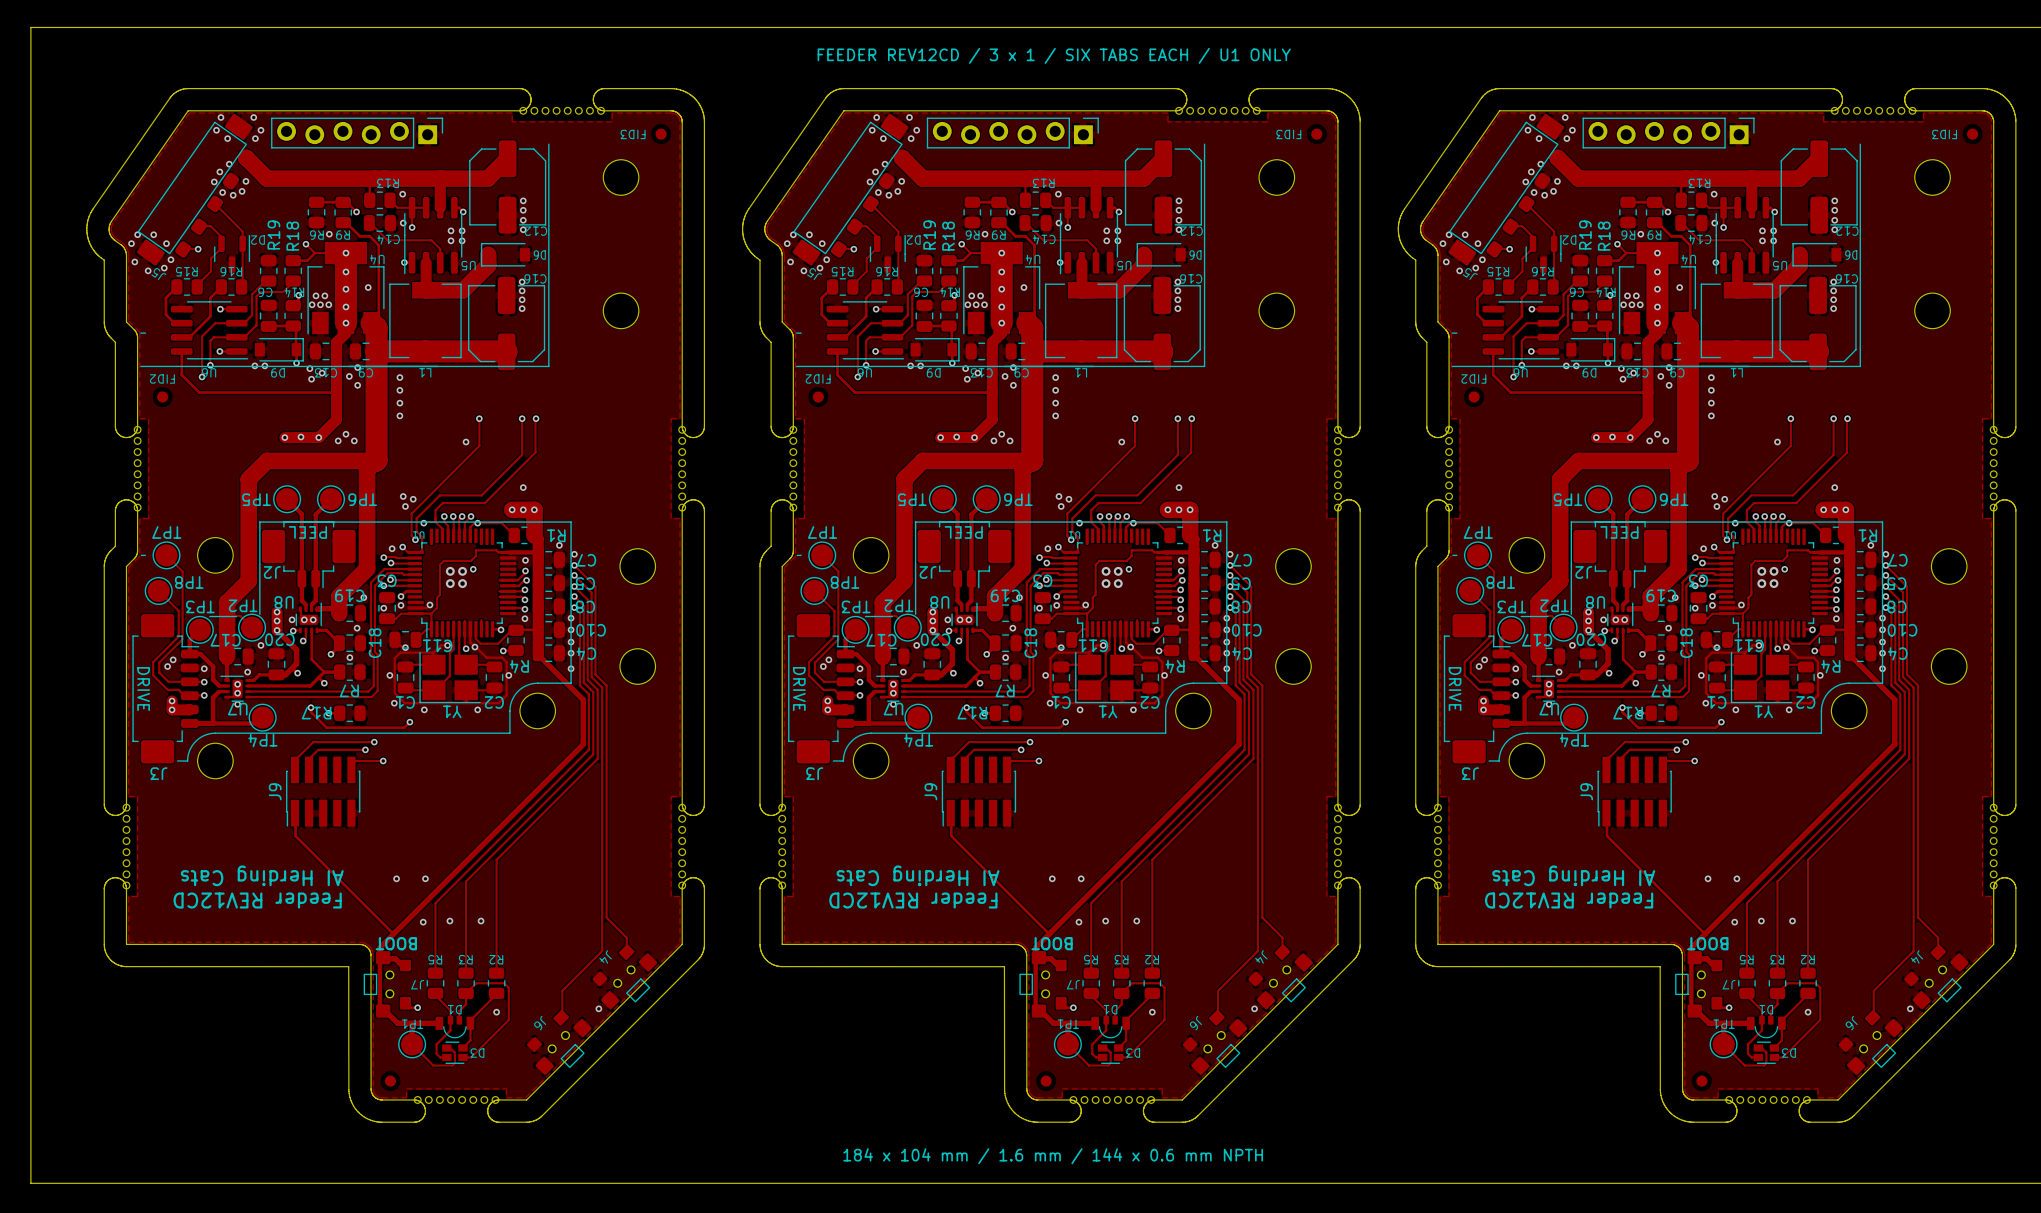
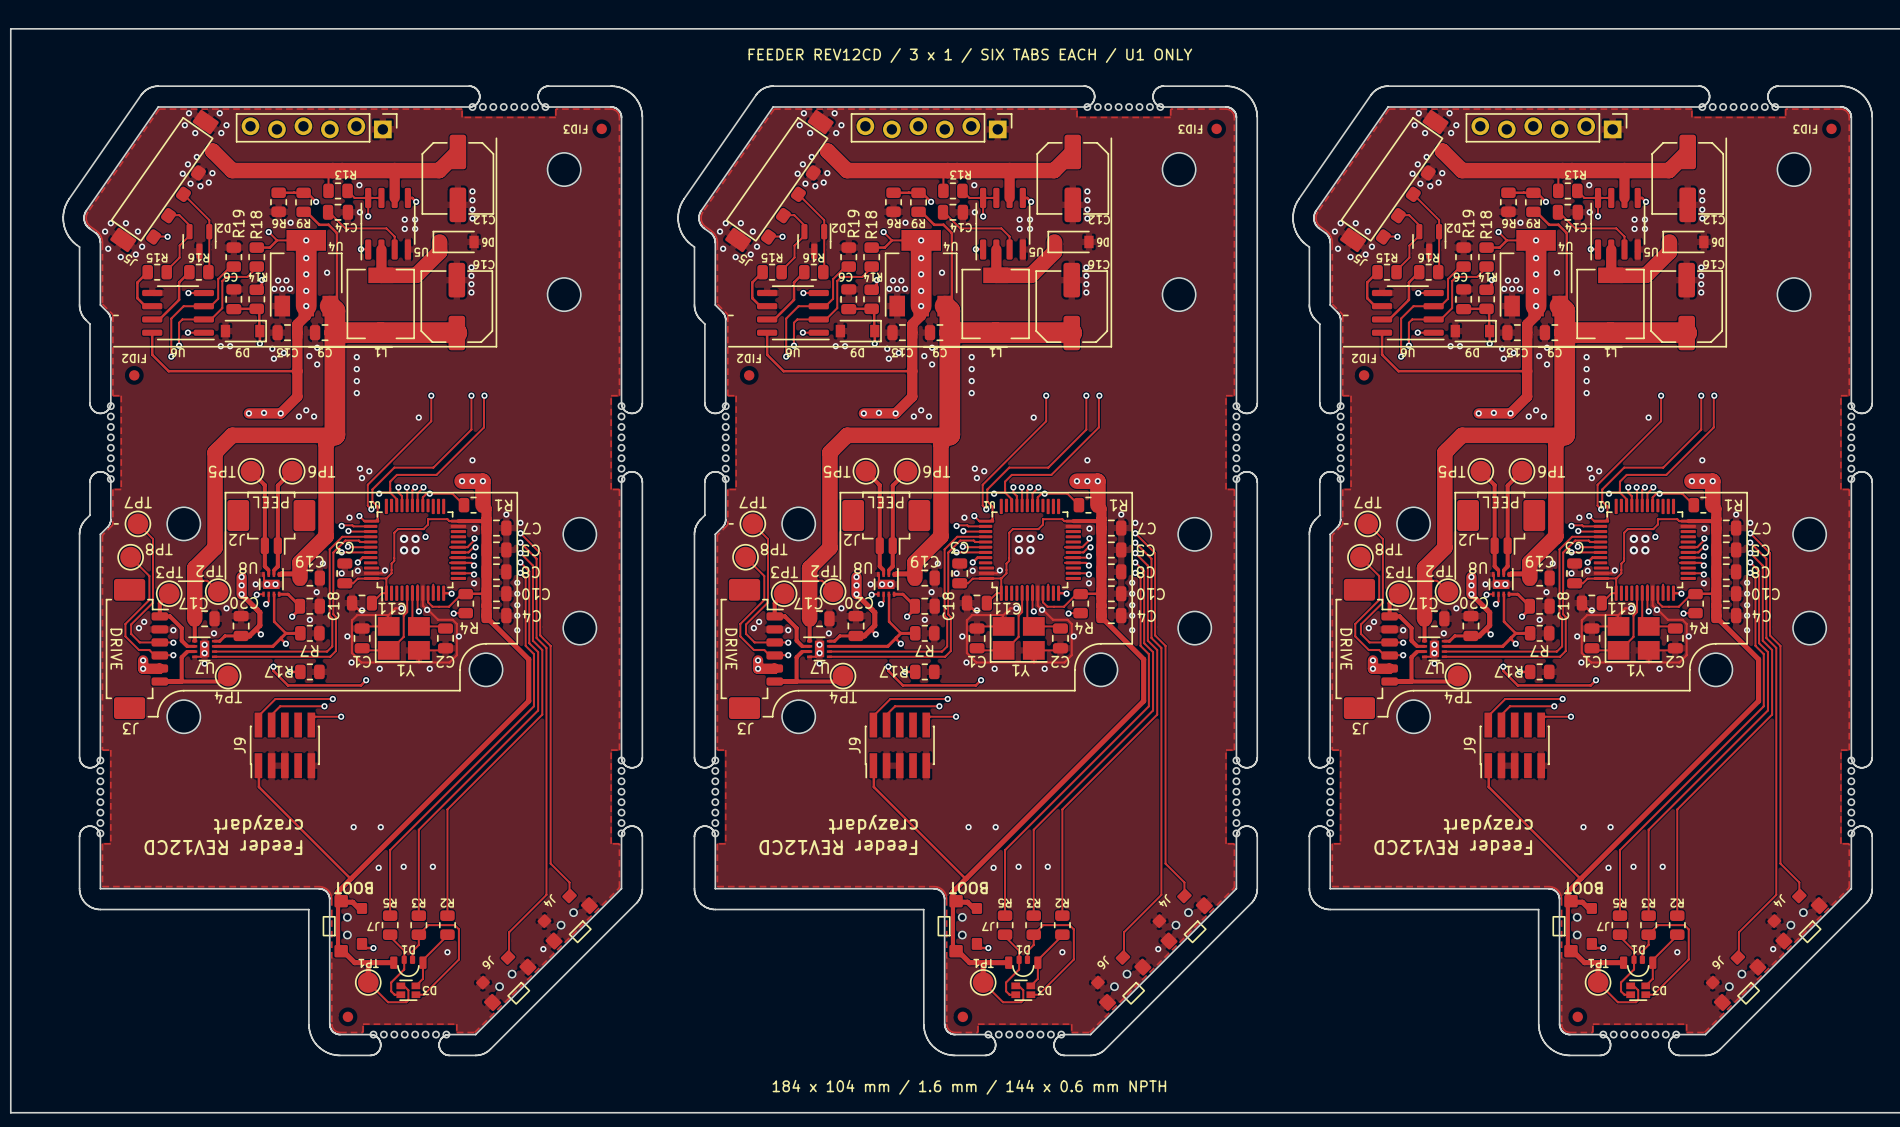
text: AI Herding Cats (262, 875) -> crazydart (258, 824)
text: AI Herding Cats (918, 875) -> crazydart (873, 824)
text: AI Herding Cats (1573, 875) -> crazydart (1488, 824)

